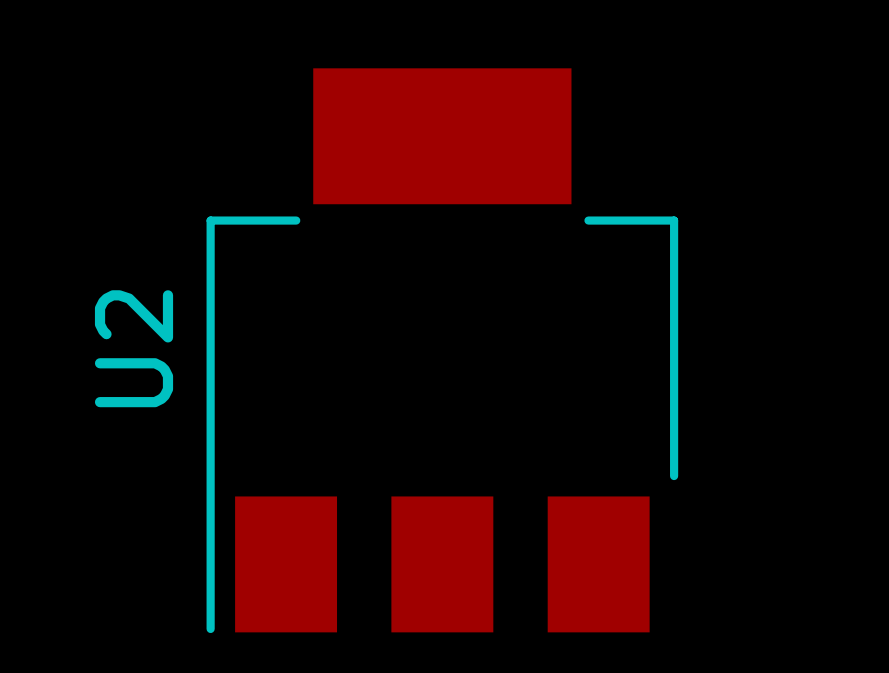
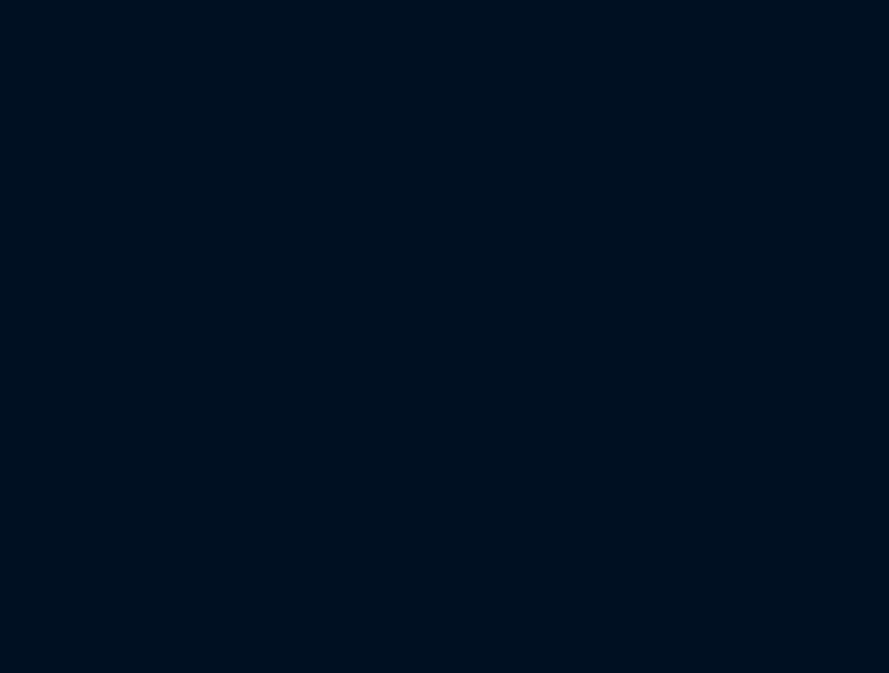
U2: (442, 350) -> none

